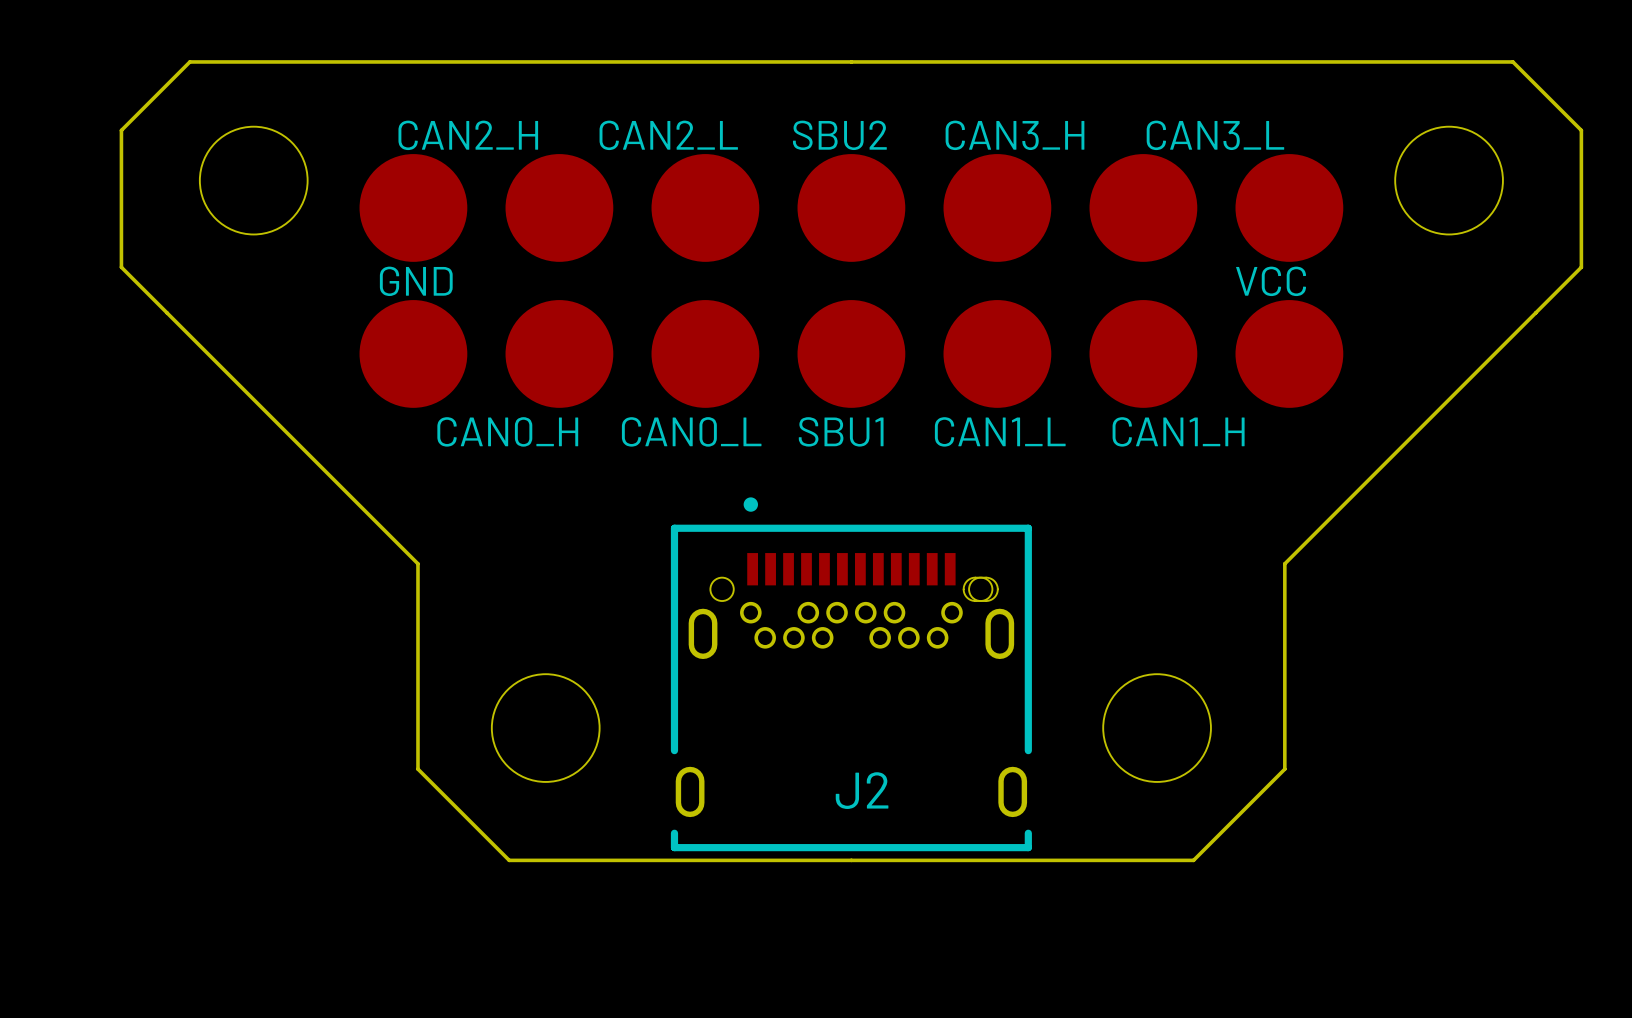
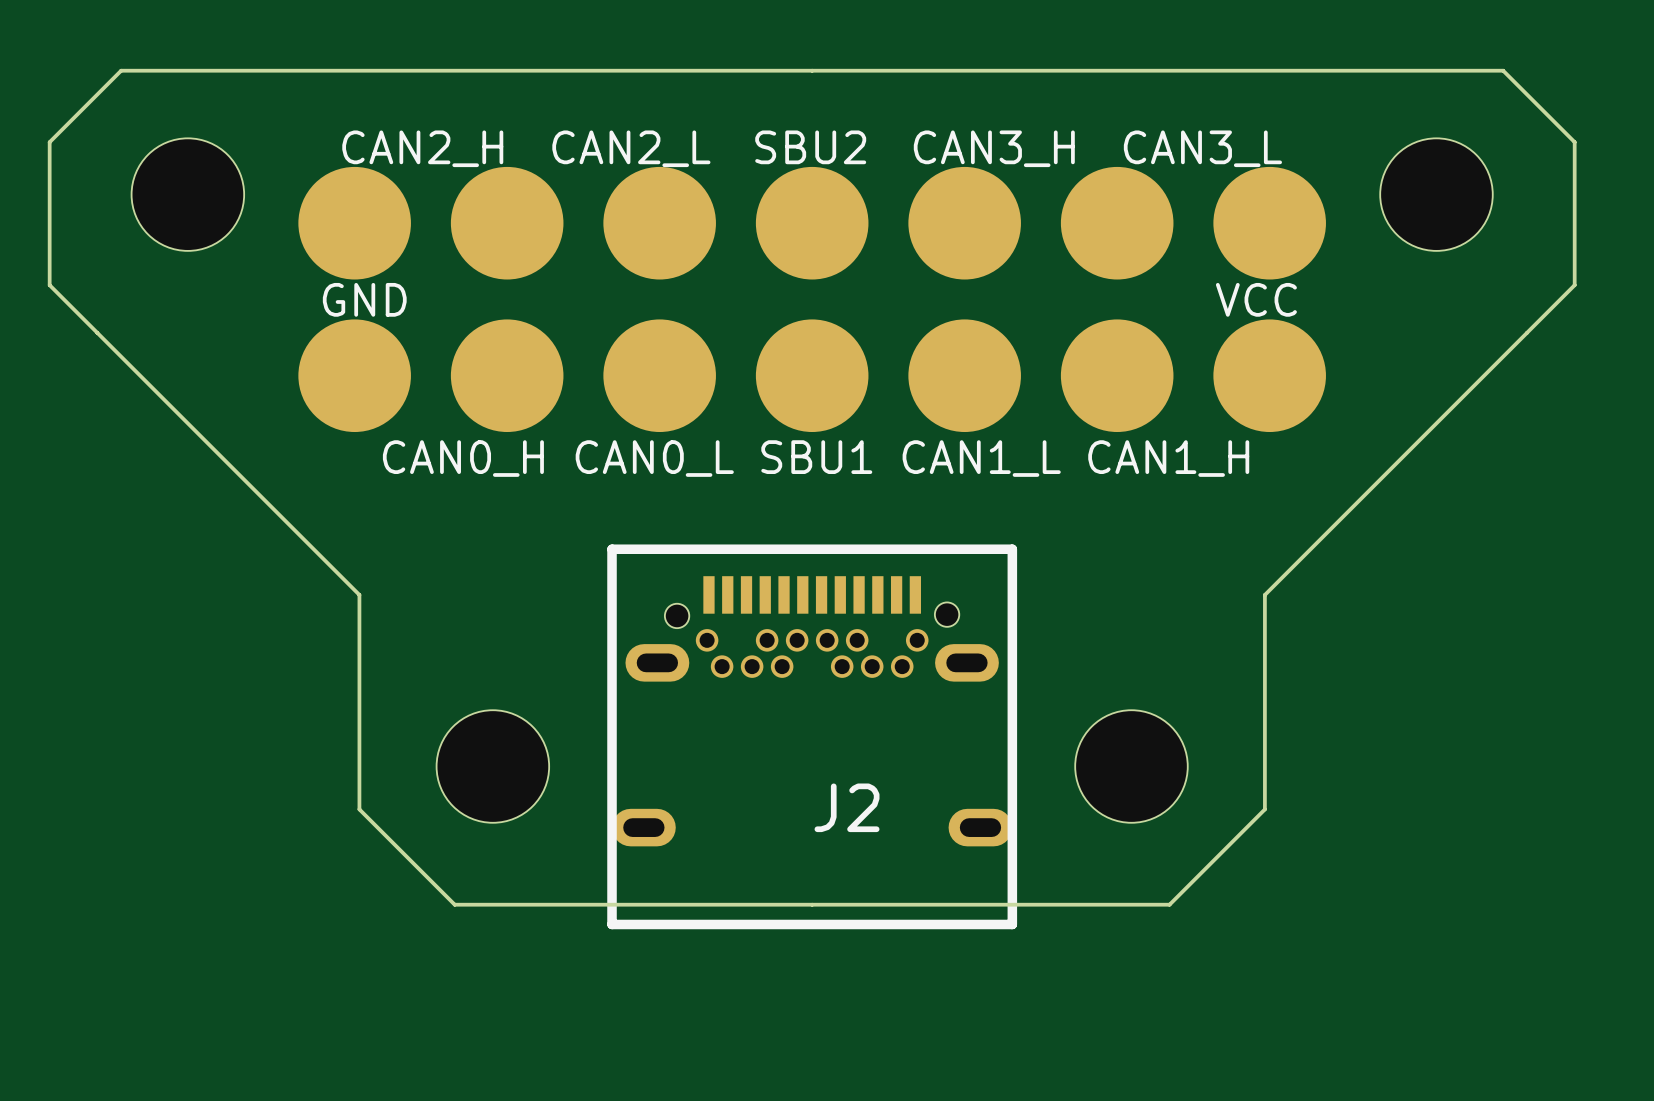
J2 footprint: [670, 497, 1032, 852] -> [607, 544, 1018, 930]

